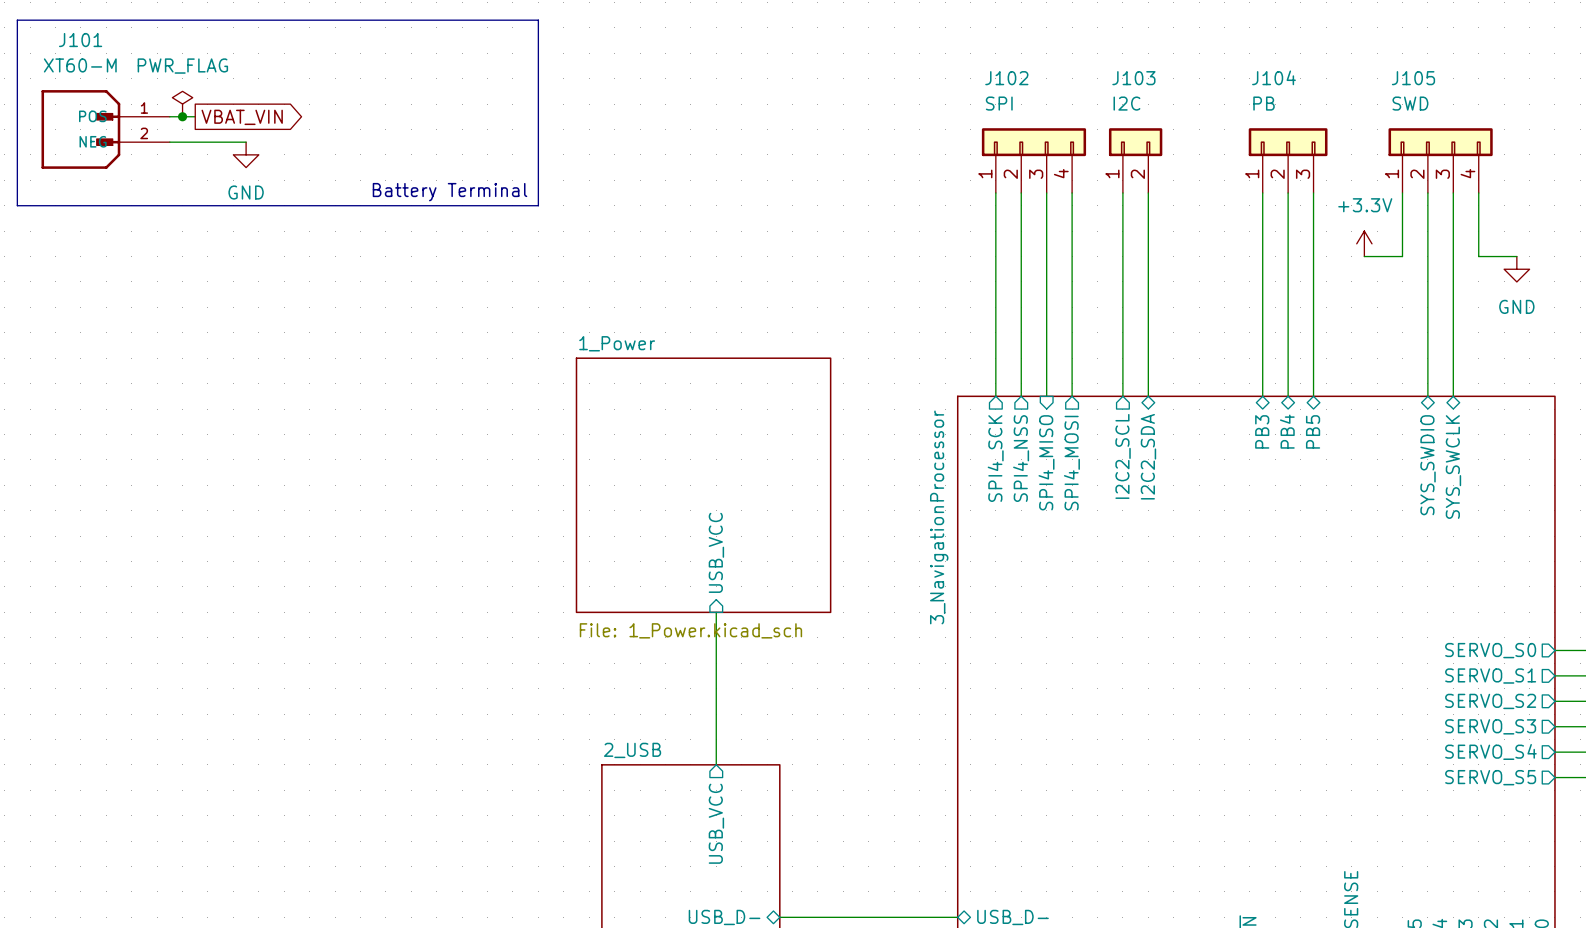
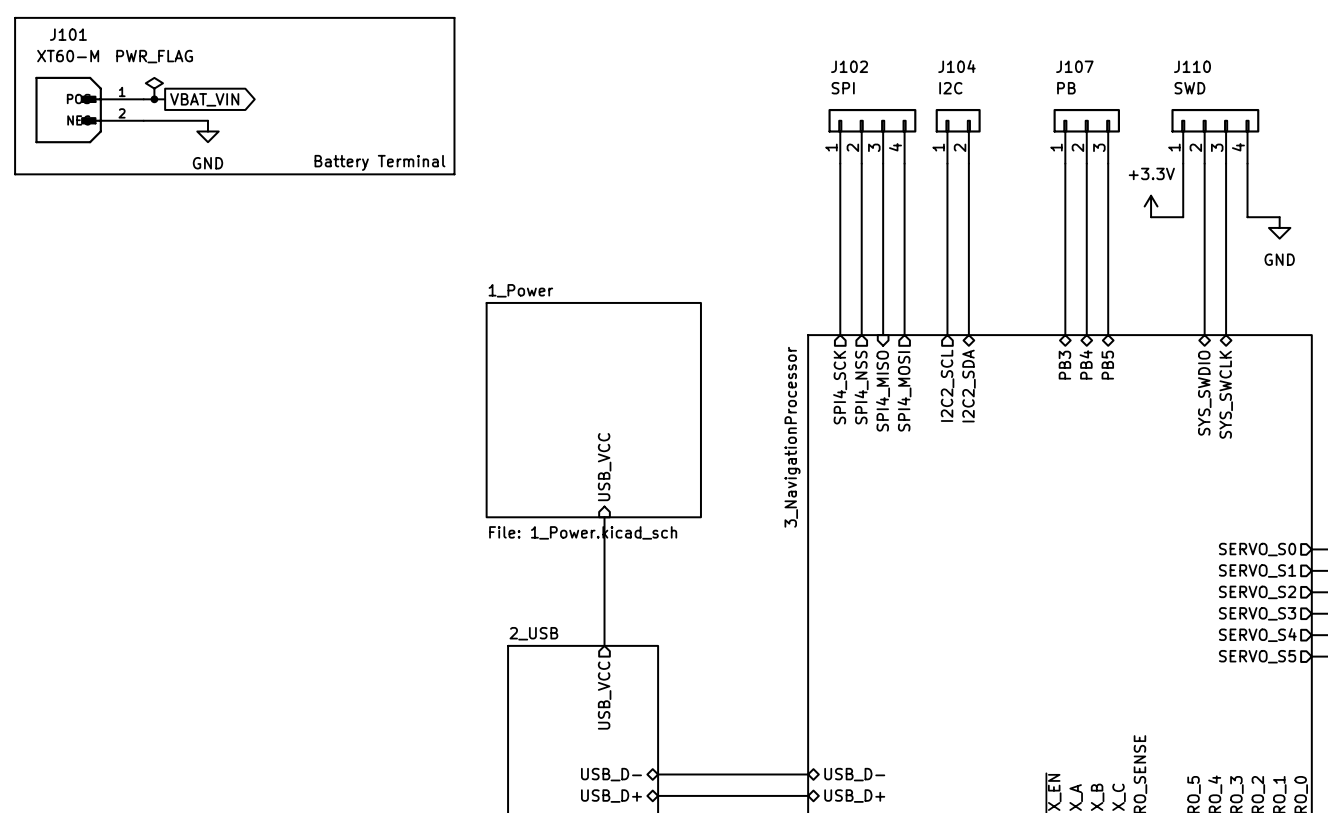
J104 name: J104 (1273, 77) -> J107 (1074, 66)
J103 name: J103 (1133, 78) -> J104 (956, 66)
J105 name: J105 (1413, 78) -> J110 (1192, 66)

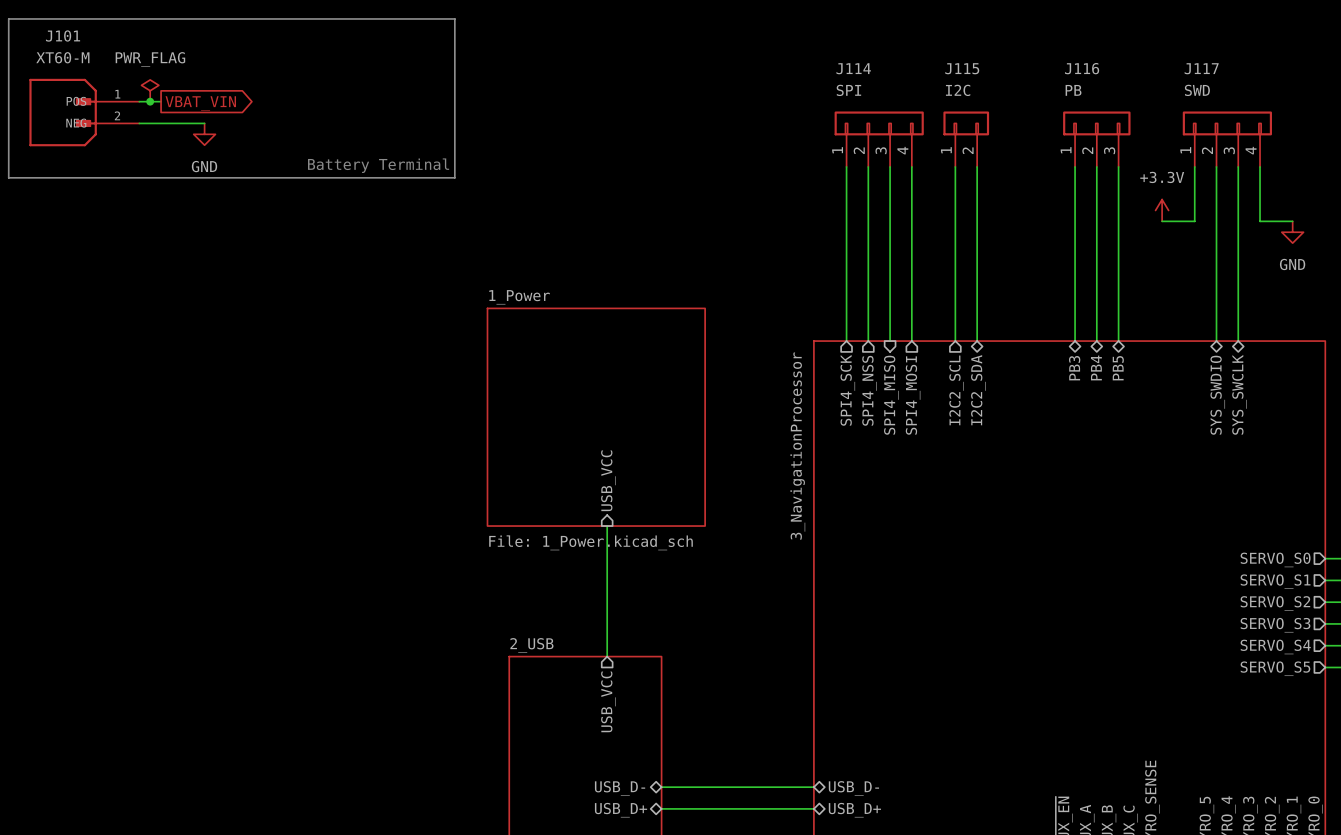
J102 name: J102 (849, 66) -> J114 (853, 68)
J104 name: J104 (956, 66) -> J115 (962, 68)
J107 name: J107 (1074, 66) -> J116 (1082, 68)
J110 name: J110 (1192, 66) -> J117 (1201, 68)

